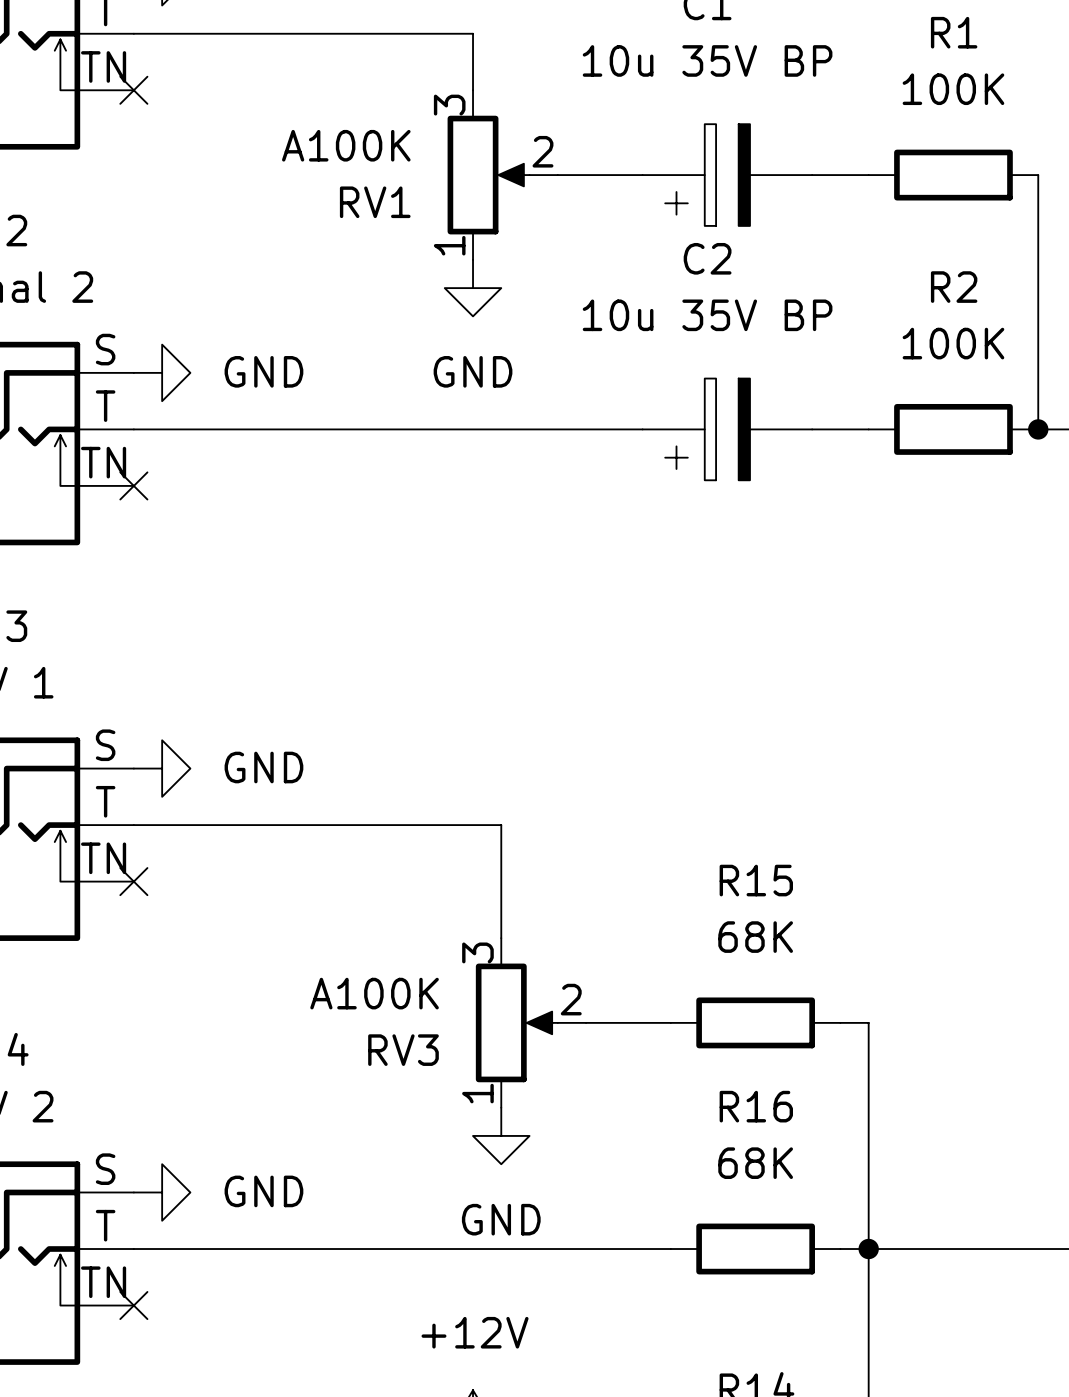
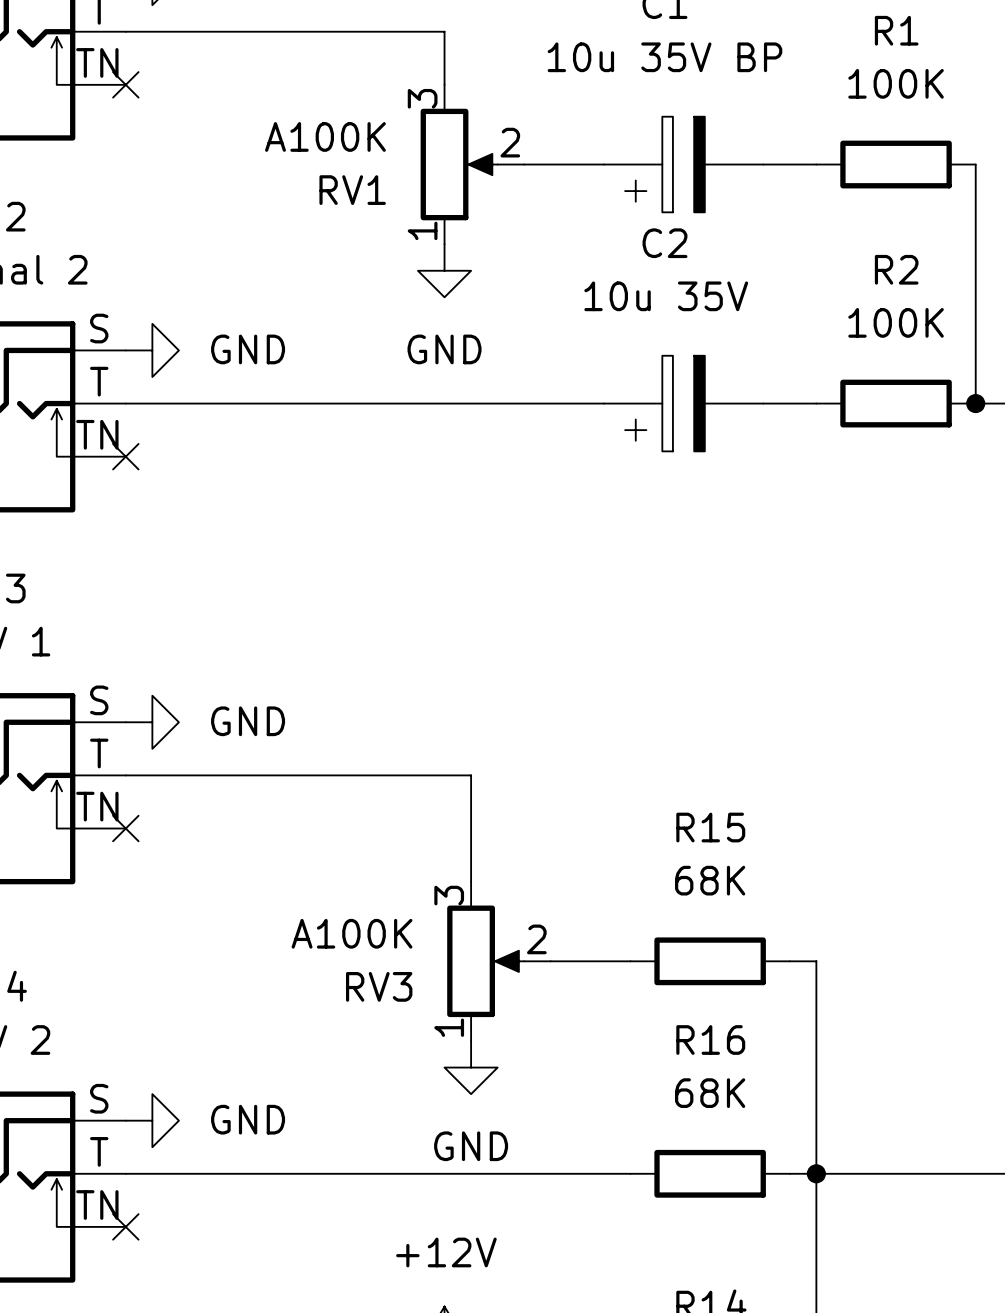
C2 value: 10u 35V BP (707, 315) -> 10u 35V (666, 296)

